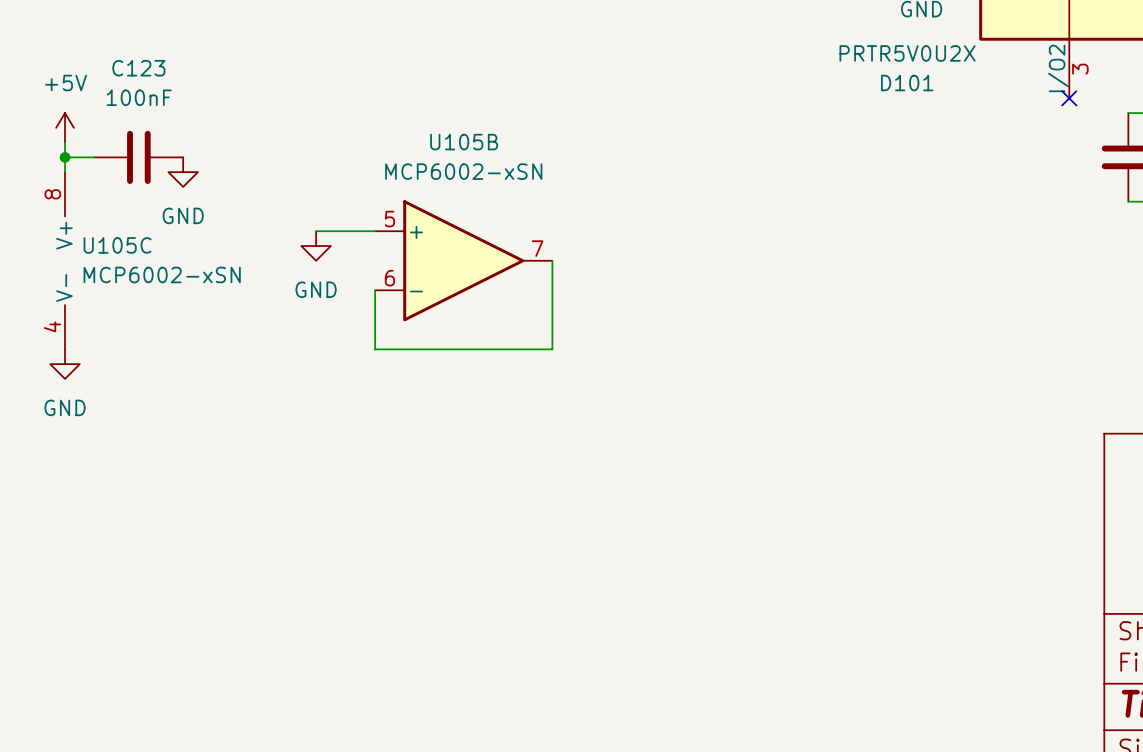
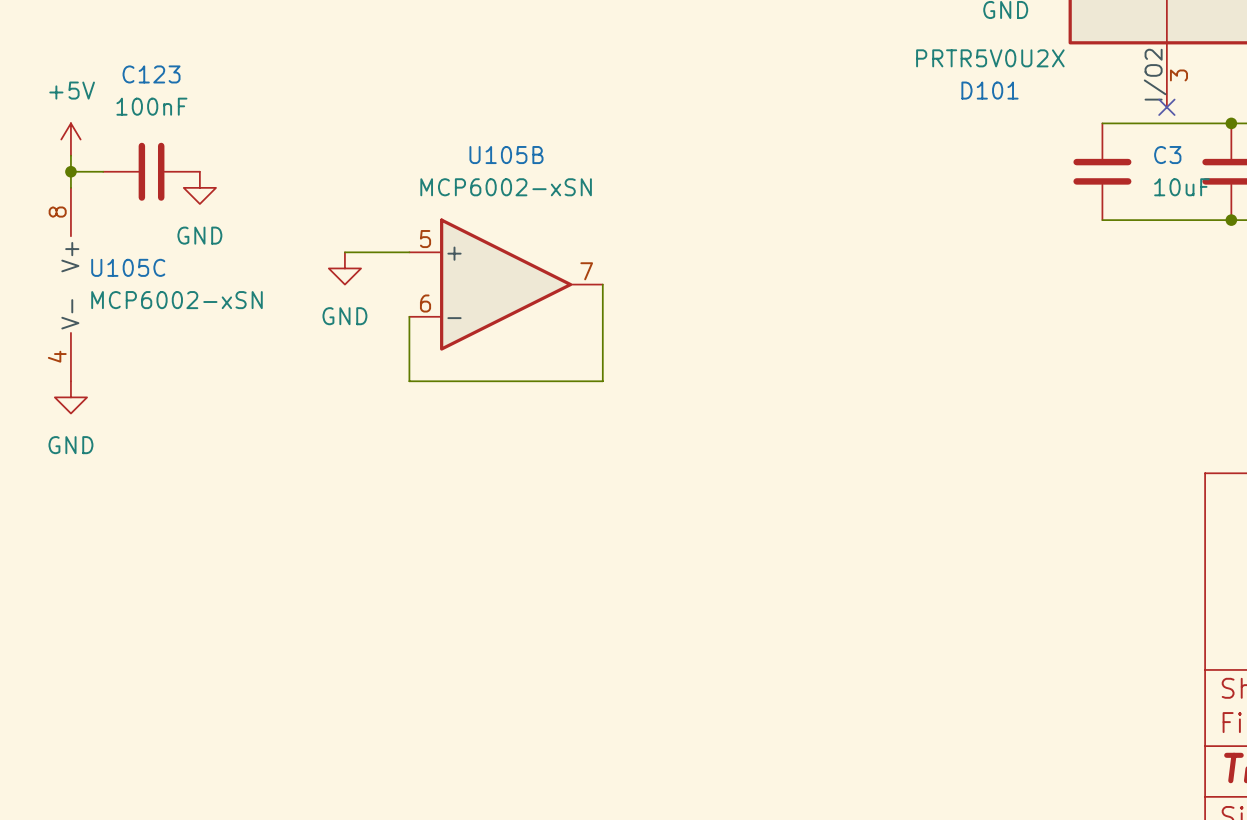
wire: none -> (1102, 123) (1231, 123)
junction: none -> (1231, 123)
C3: none -> 10uF (1102, 171)
wire: none -> (1102, 220) (1231, 220)
junction: none -> (1231, 220)

